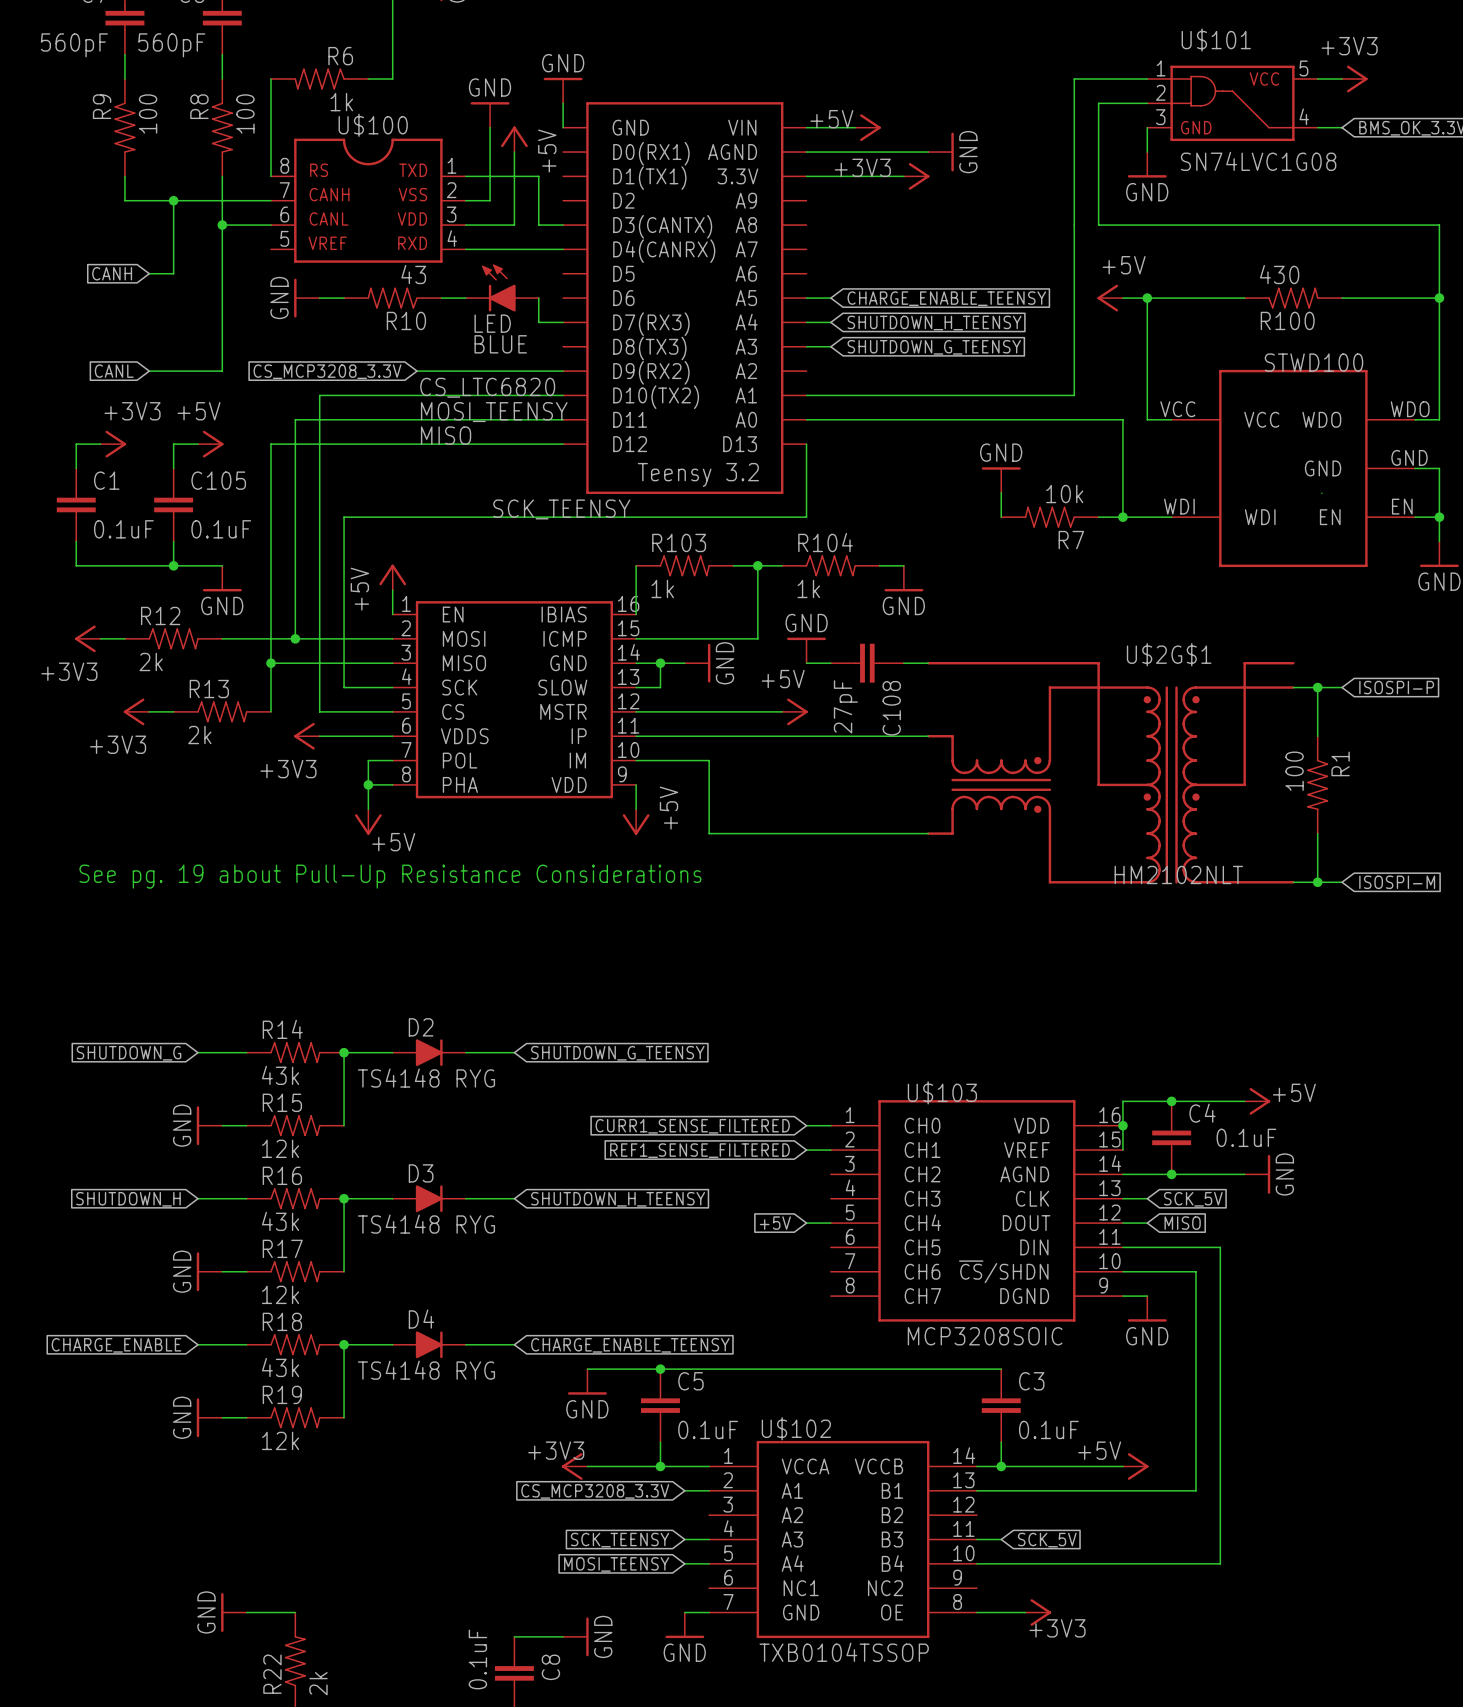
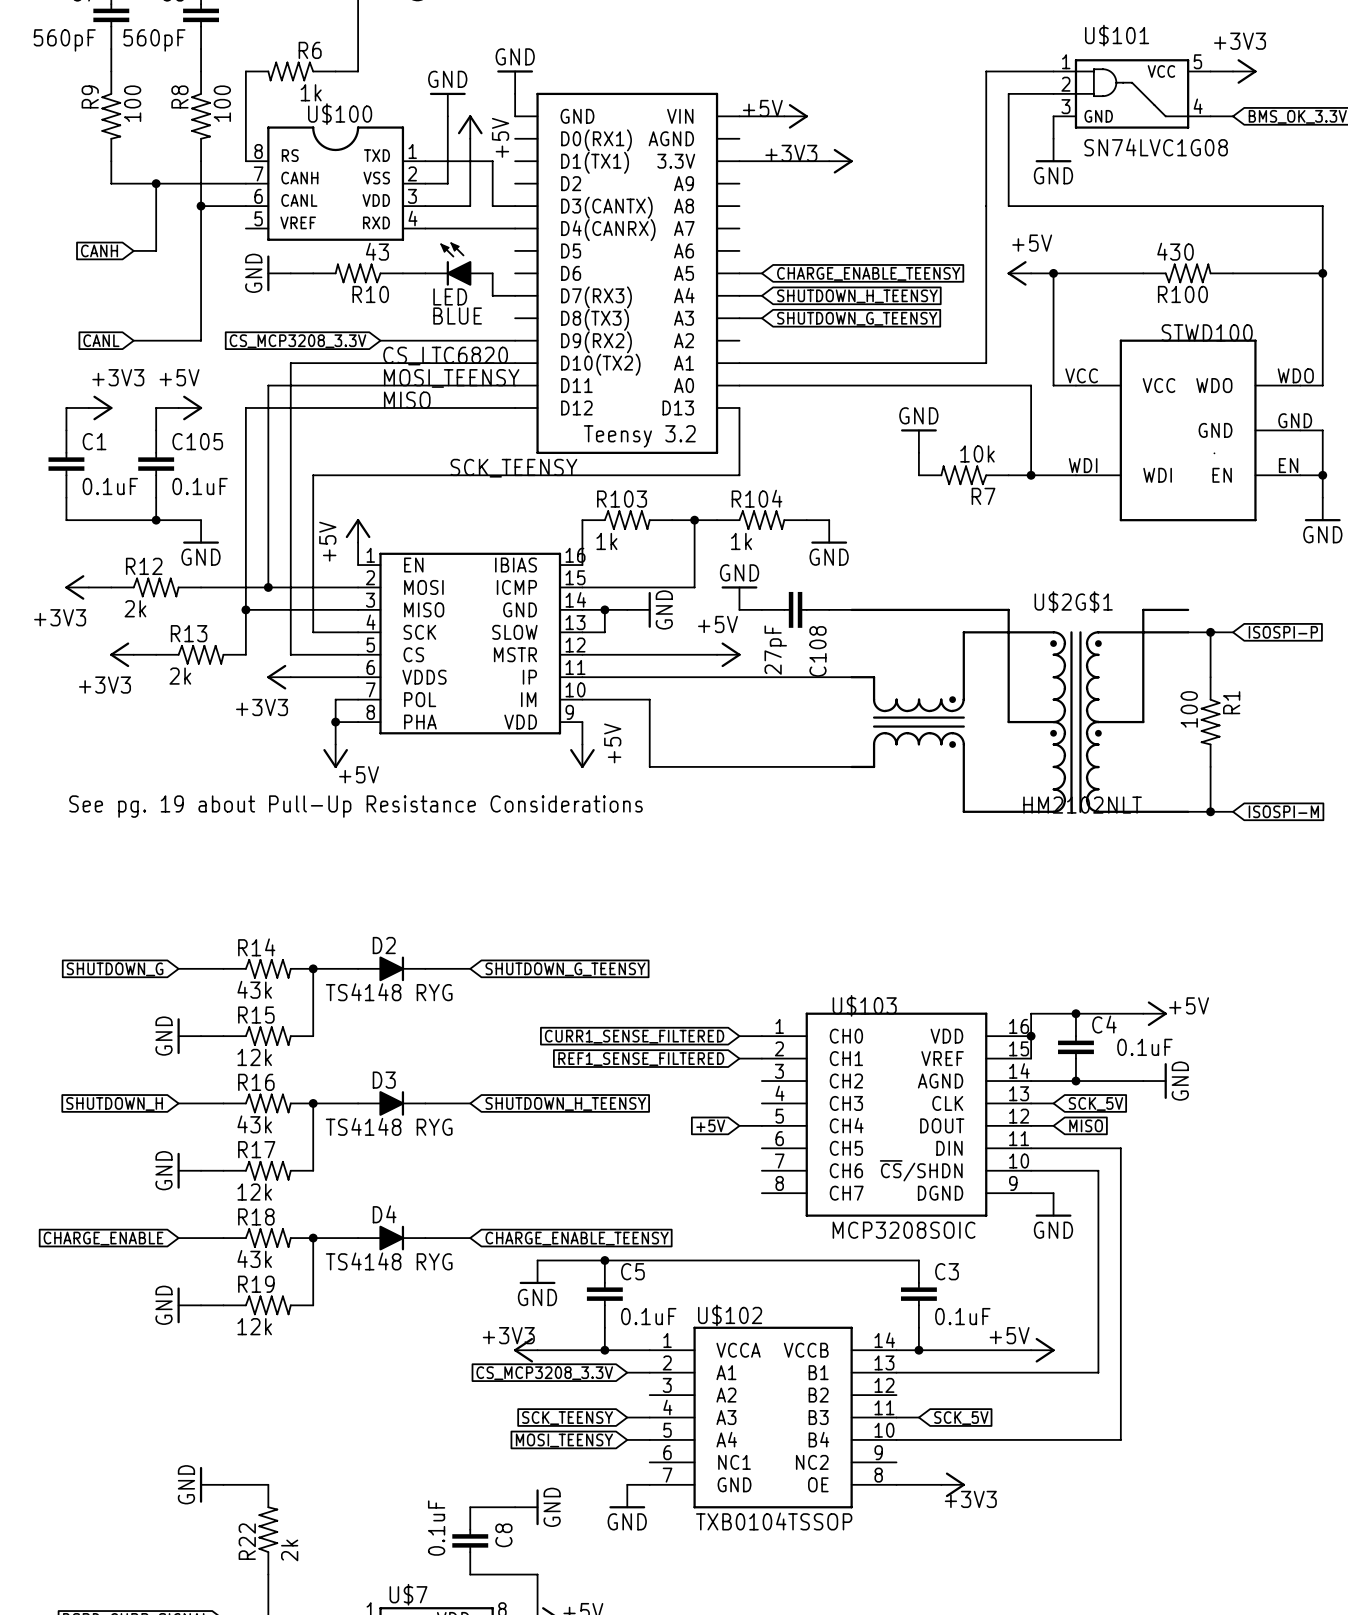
wire: (806, 152) (928, 152) -> none
power symbol: GND (941, 152) -> none

